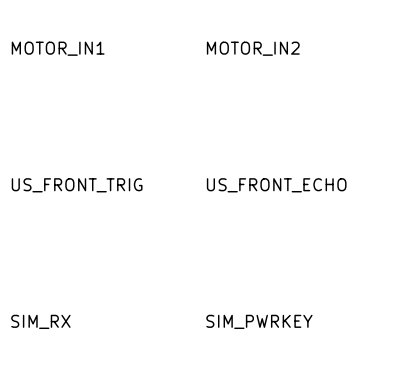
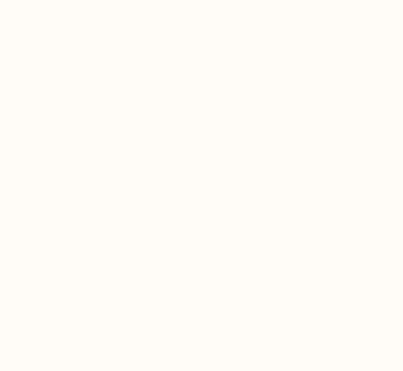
label: MOTOR_IN1 (58, 48) -> none
label: MOTOR_IN2 (253, 48) -> none
label: US_FRONT_TRIG (77, 185) -> none
label: US_FRONT_ECHO (276, 185) -> none
label: SIM_RX (40, 321) -> none
label: SIM_PWRKEY (259, 321) -> none

